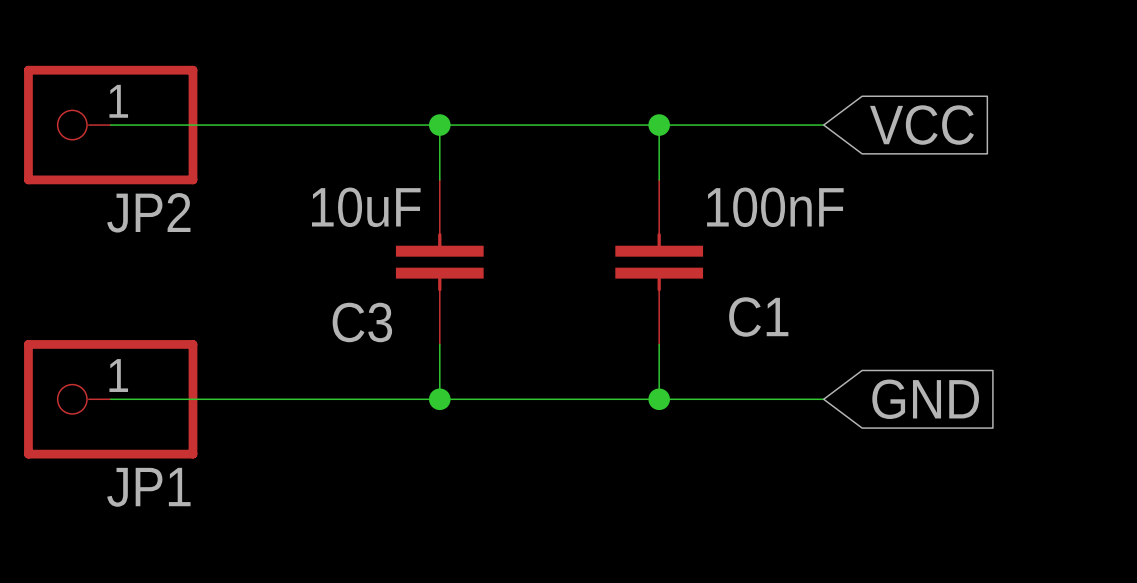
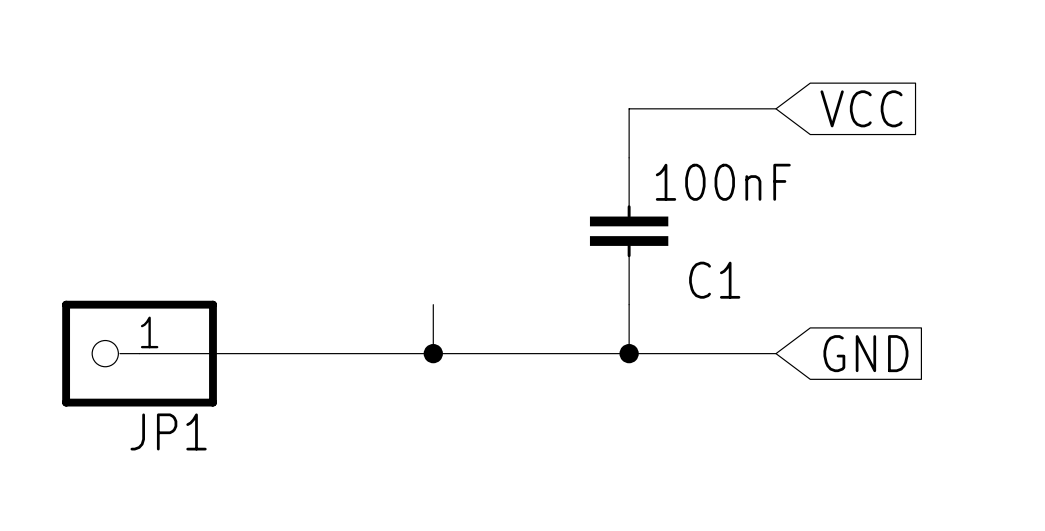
wire: (110, 125) (659, 125) -> none
JP2: (110, 125) -> none
wire: (439, 125) (439, 179) -> none
junction: (439, 125) -> none
junction: (659, 125) -> none
C3: 10uF (439, 262) -> none

